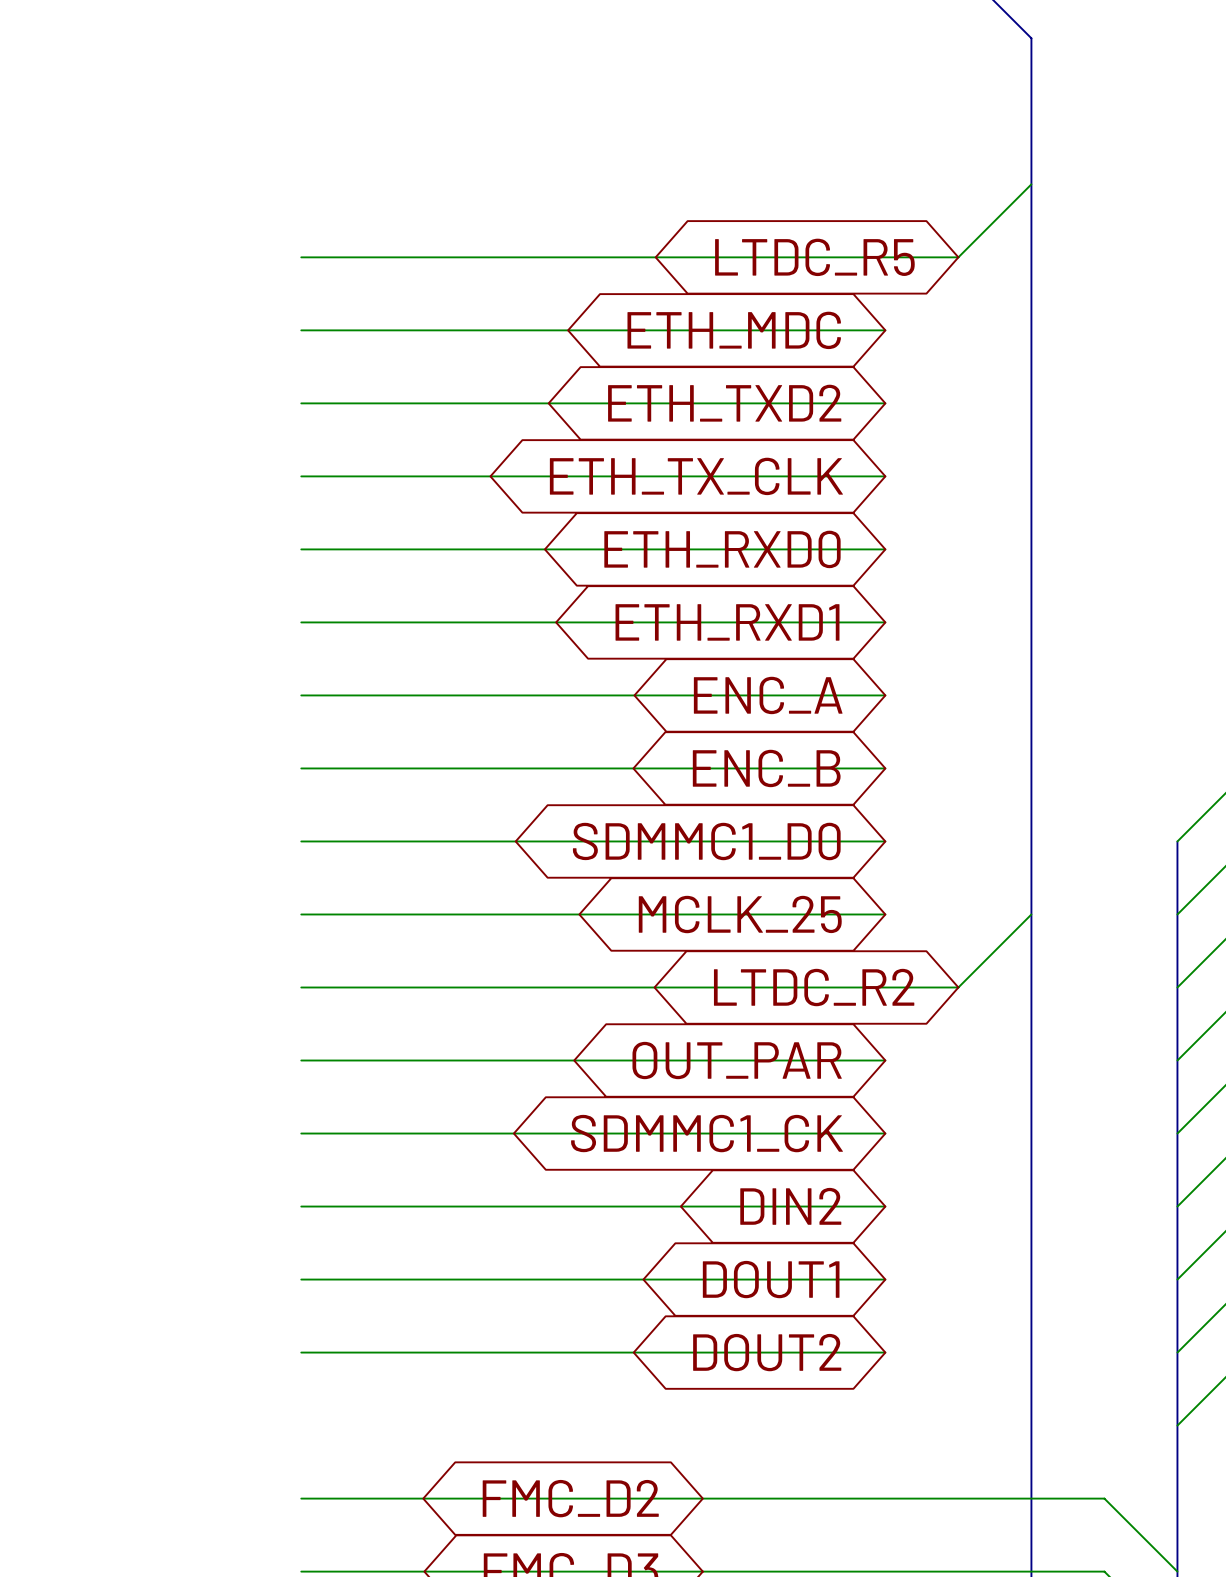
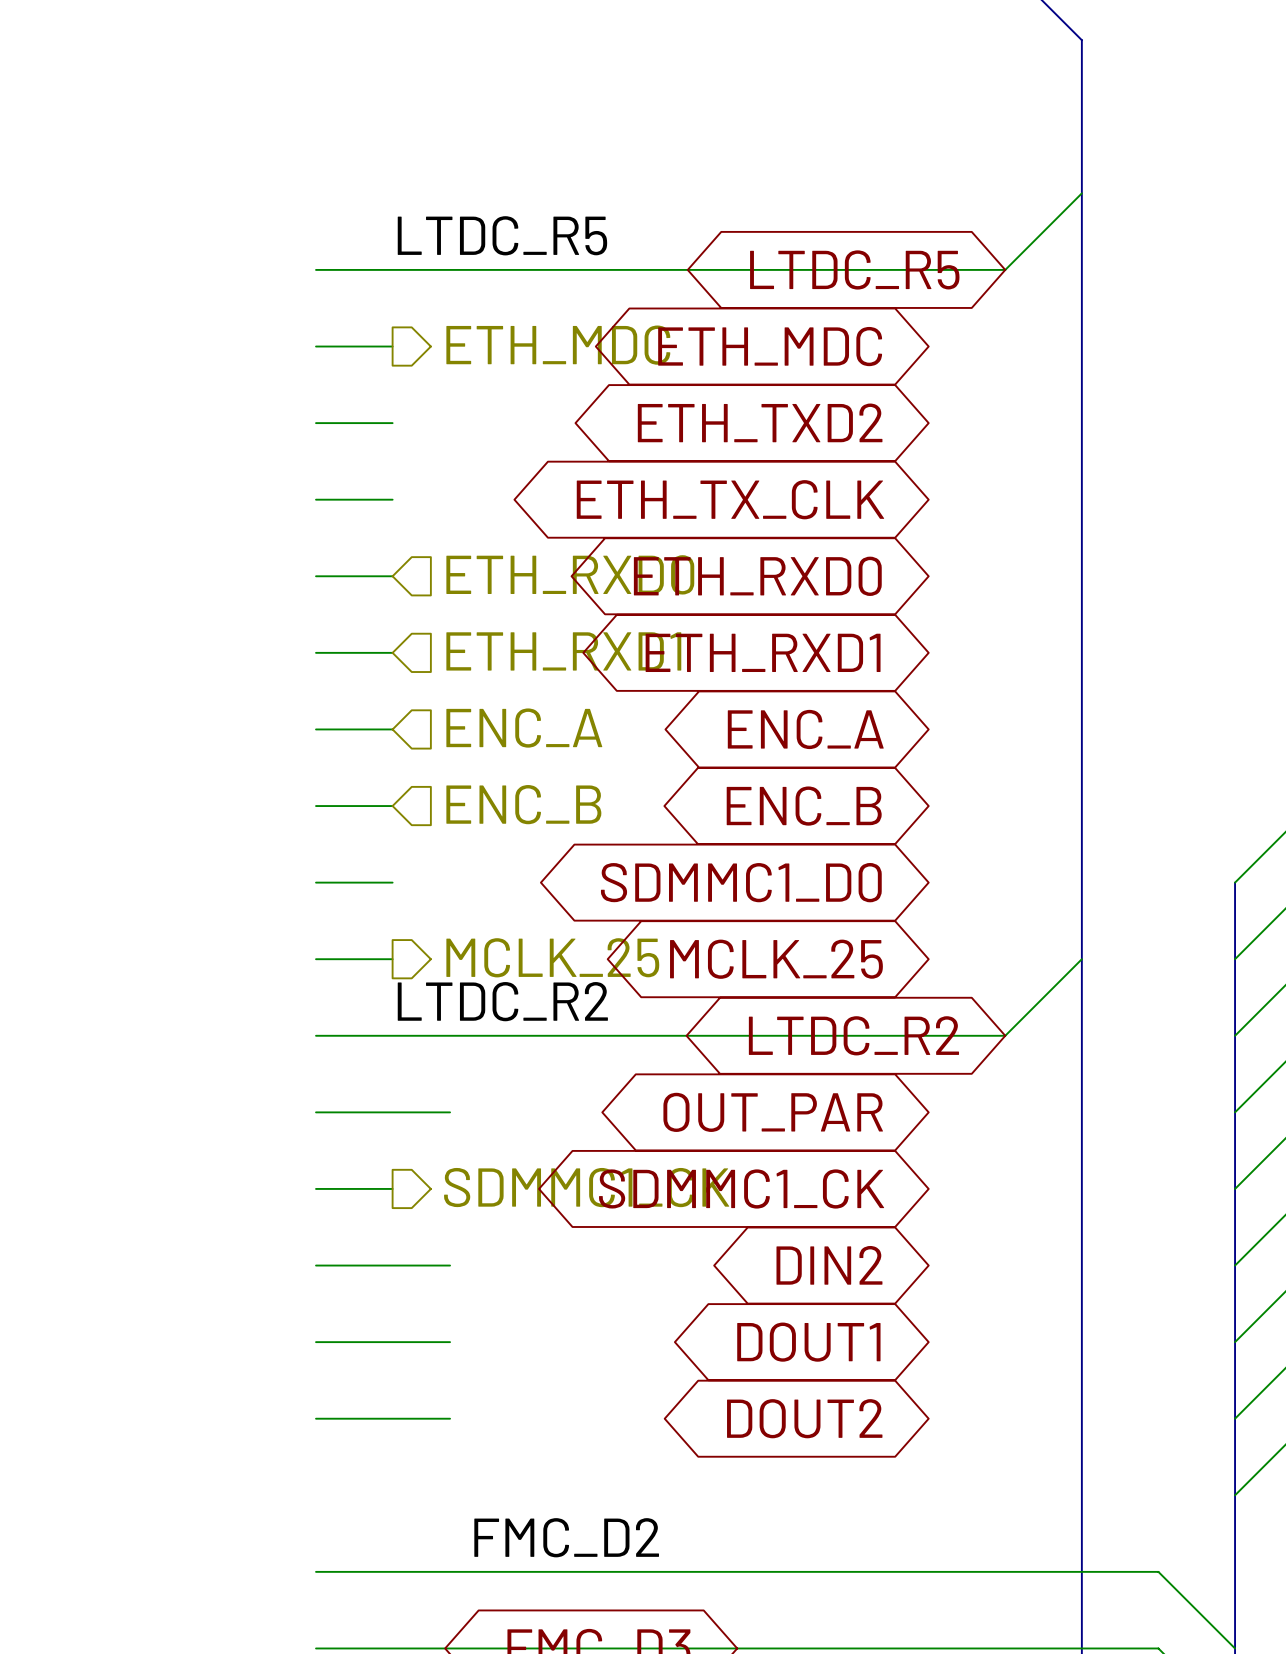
label: none -> LTDC_R5 (502, 235)
hierarchical label: none -> ETH_MDC (558, 345)
wire: (374, 330) (885, 330) -> none
wire: (374, 403) (885, 403) -> none
wire: (374, 476) (885, 476) -> none
hierarchical label: none -> ETH_RXD0 (570, 574)
wire: (374, 549) (885, 549) -> none
hierarchical label: none -> ETH_RXD1 (563, 651)
wire: (374, 622) (885, 622) -> none
hierarchical label: none -> ENC_A (524, 728)
wire: (374, 695) (885, 695) -> none
hierarchical label: none -> ENC_B (523, 804)
wire: (374, 768) (885, 768) -> none
wire: (374, 841) (885, 841) -> none
hierarchical label: none -> MCLK_25 (552, 957)
wire: (374, 914) (885, 914) -> none
label: none -> LTDC_R2 (502, 1001)
wire: (429, 1060) (885, 1060) -> none
hierarchical label: none -> SDMMC1_CK (586, 1187)
wire: (374, 1133) (885, 1133) -> none
wire: (429, 1206) (885, 1206) -> none
wire: (429, 1279) (885, 1279) -> none
wire: (429, 1352) (885, 1352) -> none
label: none -> FMC_D2 (566, 1537)
global label: FMC_D2 (570, 1498) -> none

